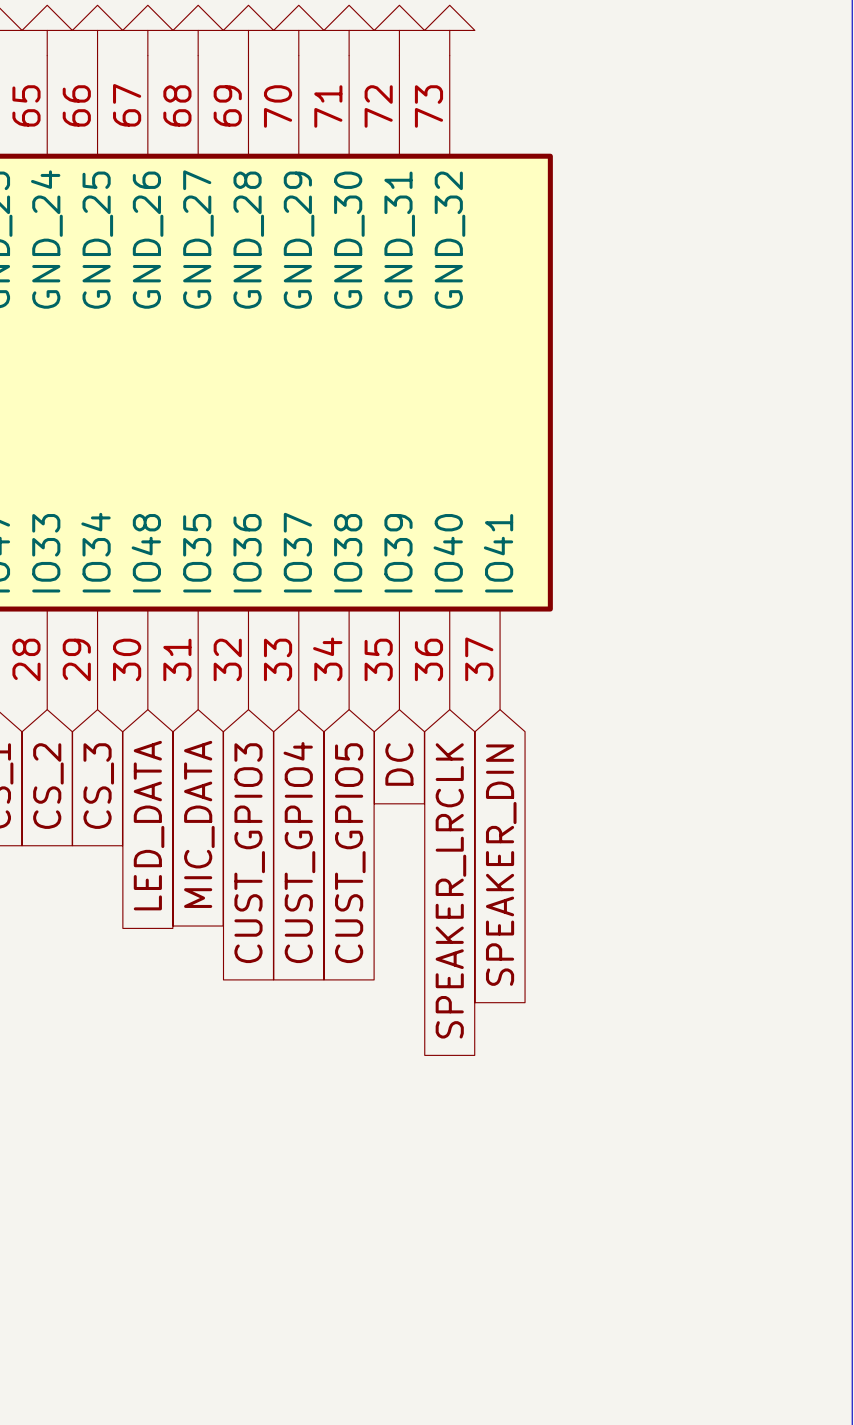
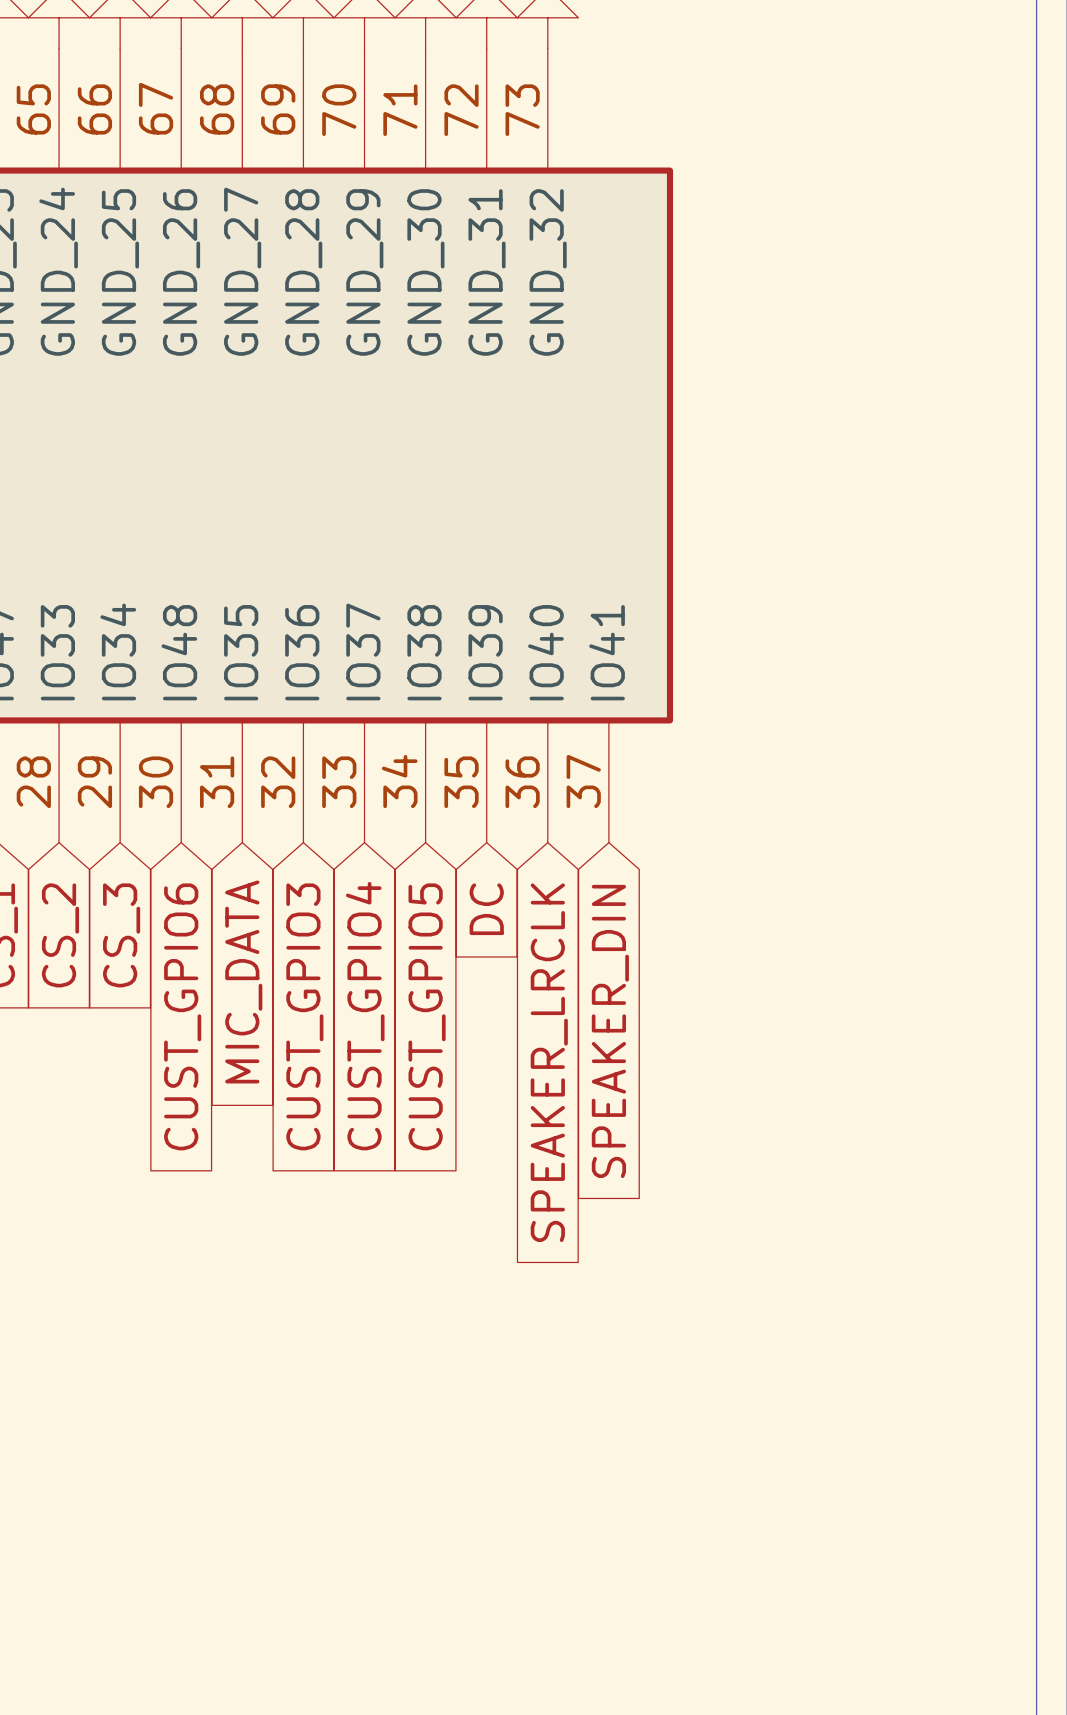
global label: LED_DATA (149, 825) -> CUST_GPIO6 (182, 1016)

